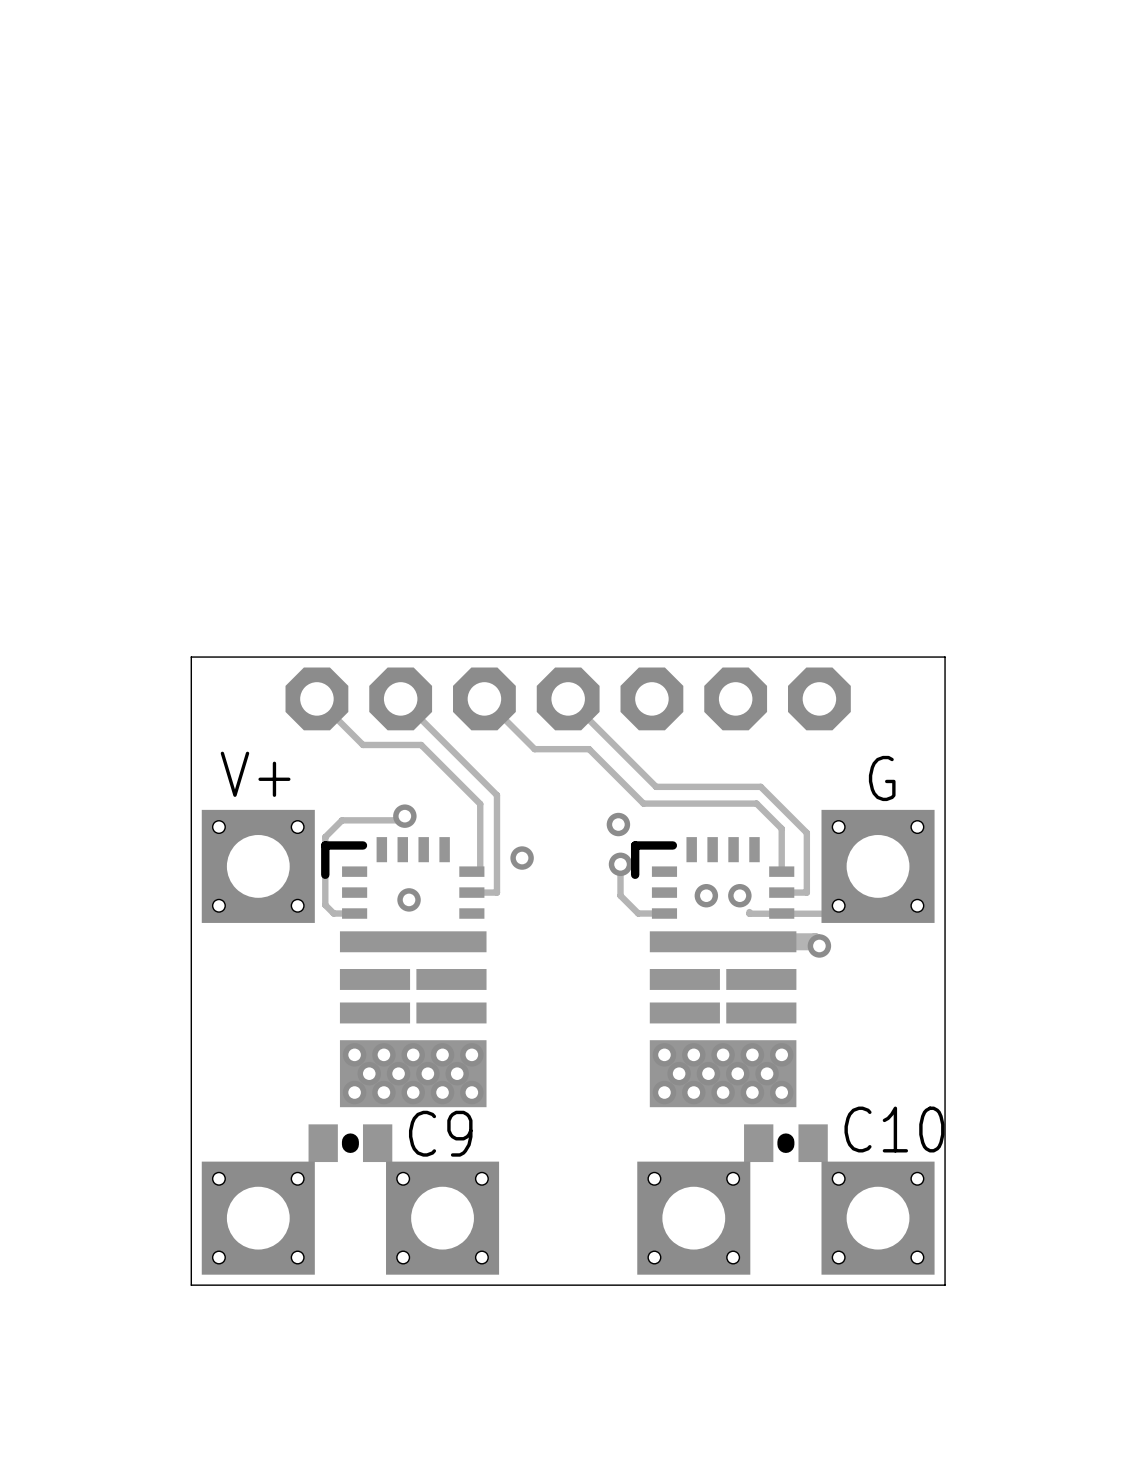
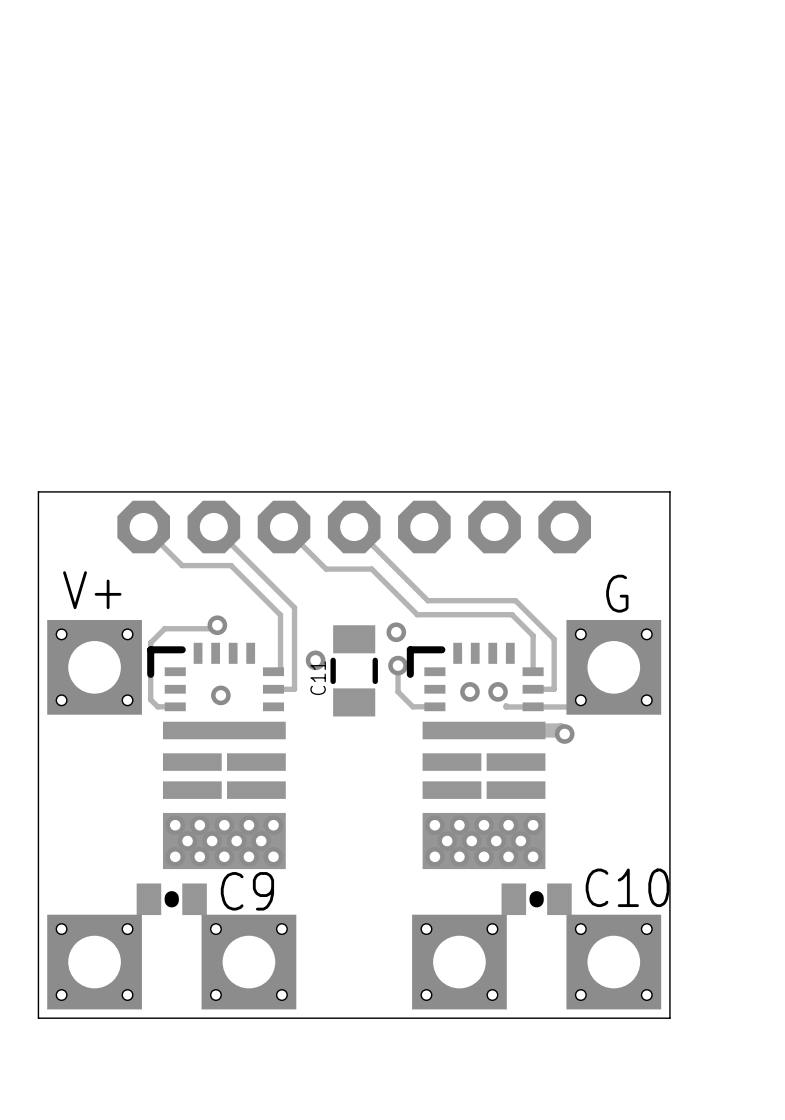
C11: none -> (354, 670)

